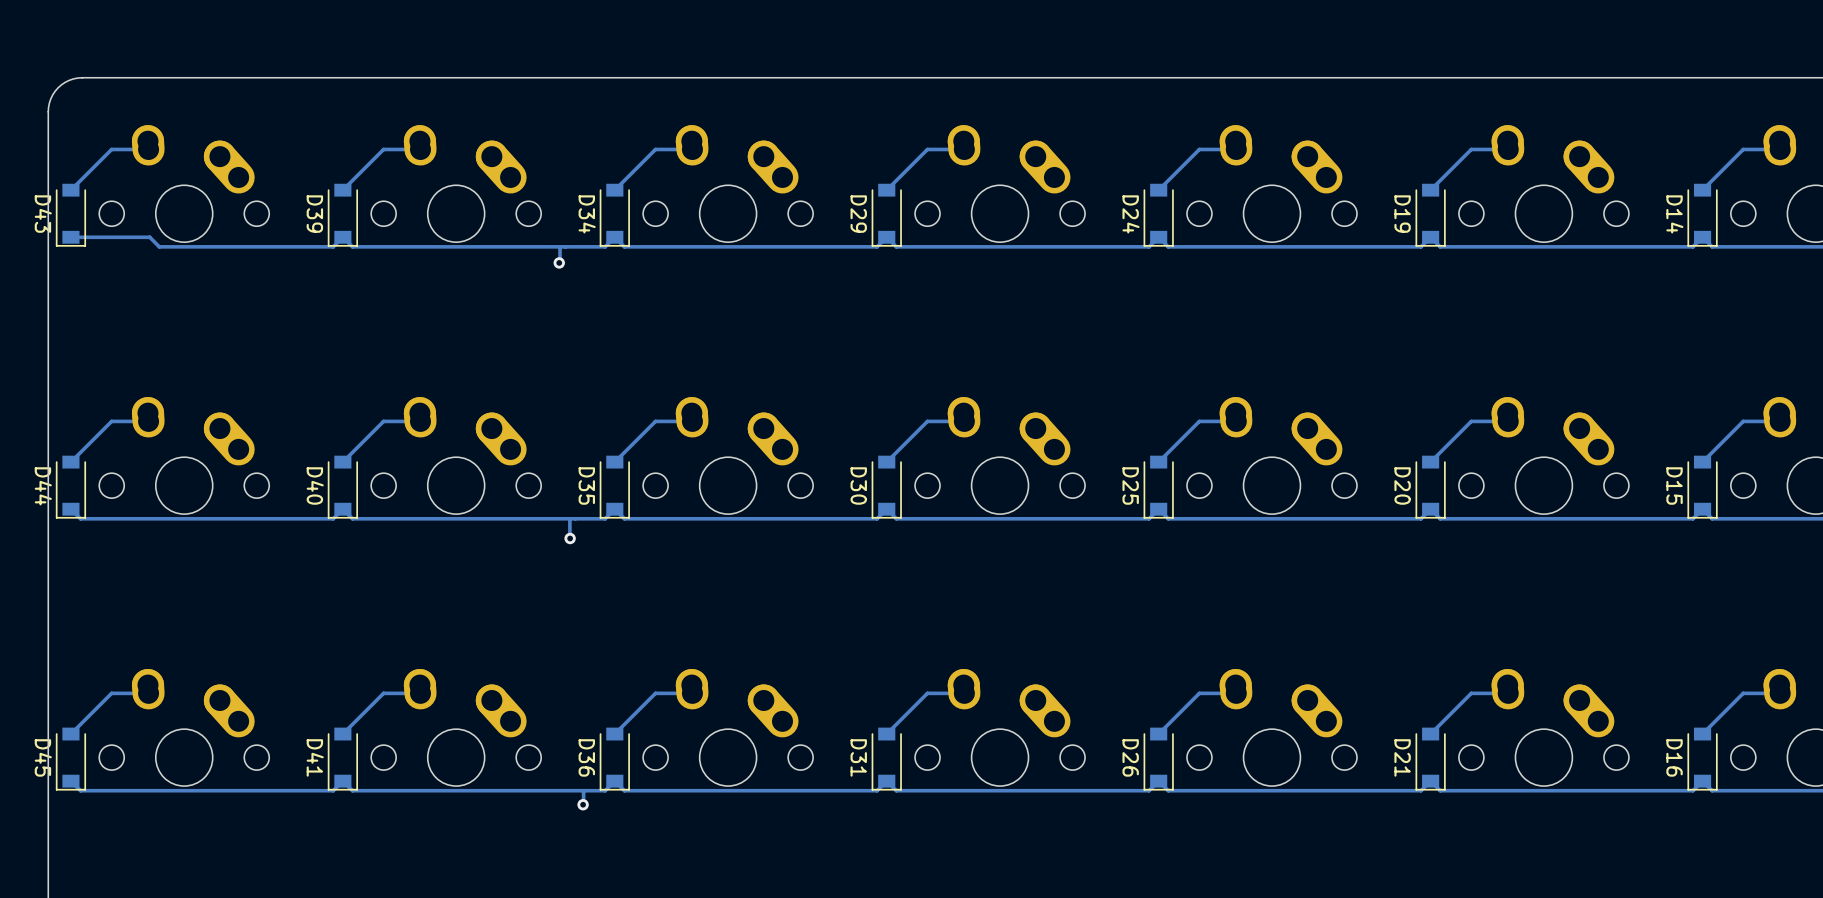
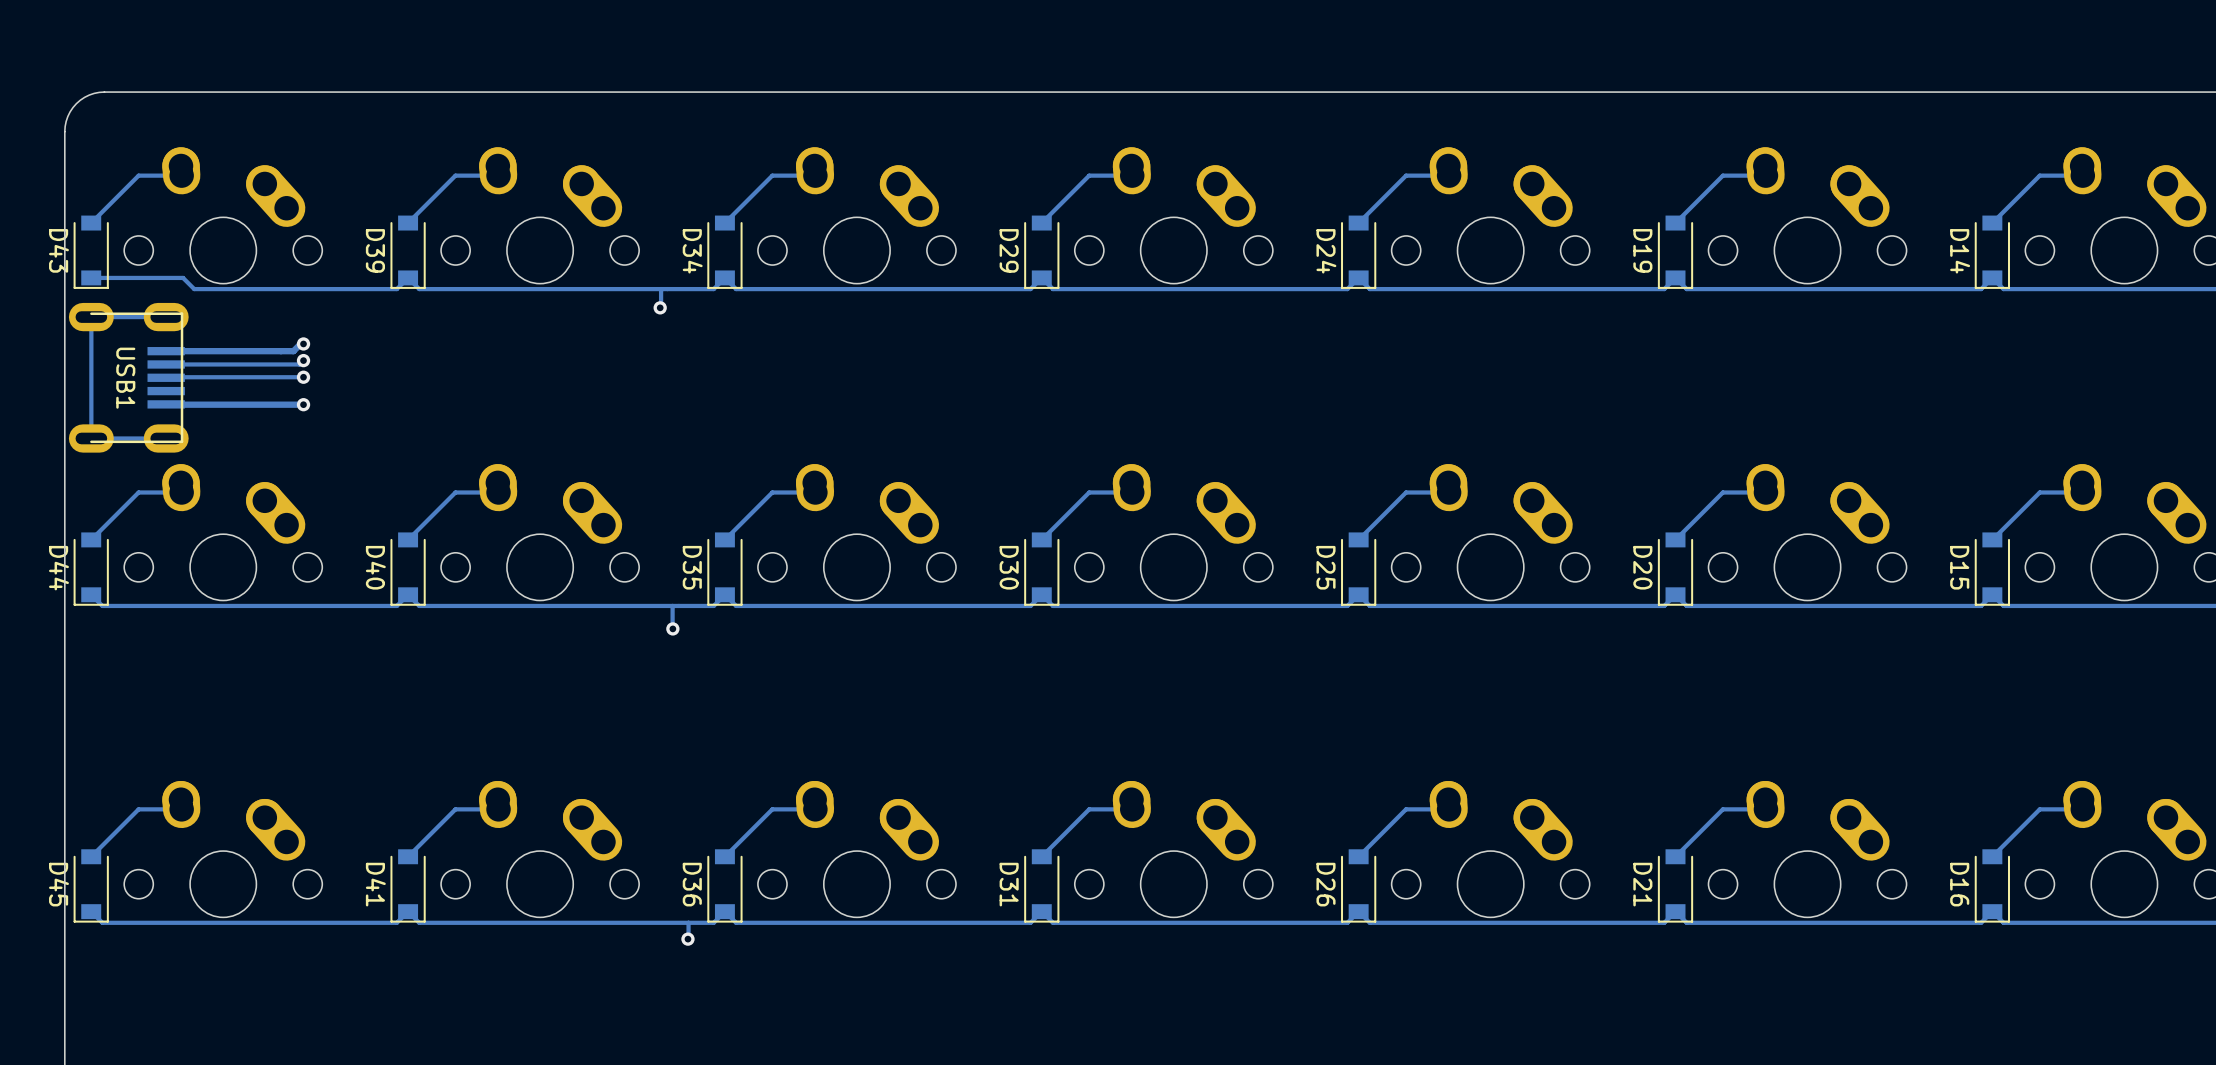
track: none -> (166, 317) (91, 317) (91, 438) (166, 438)
track: none -> (303, 343) (300, 343) (293, 351) (166, 351)
via: none -> (303, 343)
track: none -> (303, 360) (299, 364) (166, 364)
via: none -> (303, 360)
USB1: none -> (128, 377)
track: none -> (303, 377) (166, 377)
via: none -> (303, 377)
track: none -> (166, 404) (303, 404)
via: none -> (303, 404)

